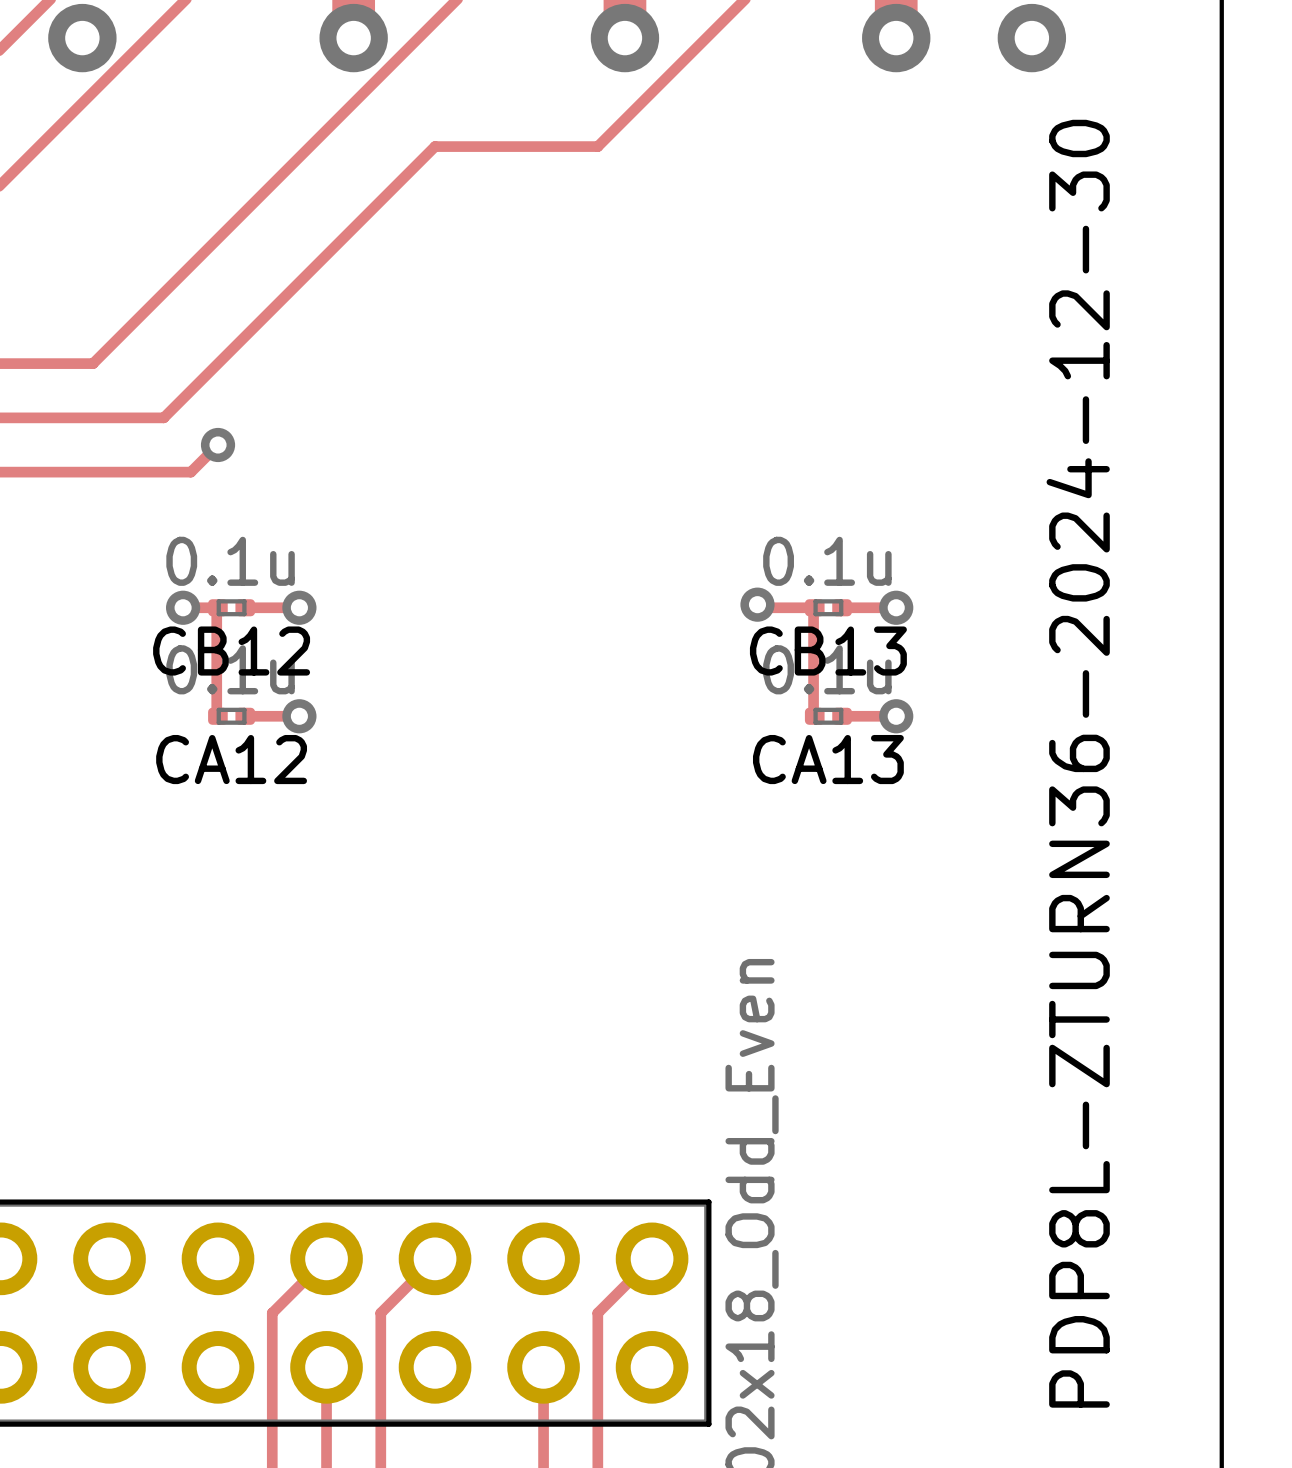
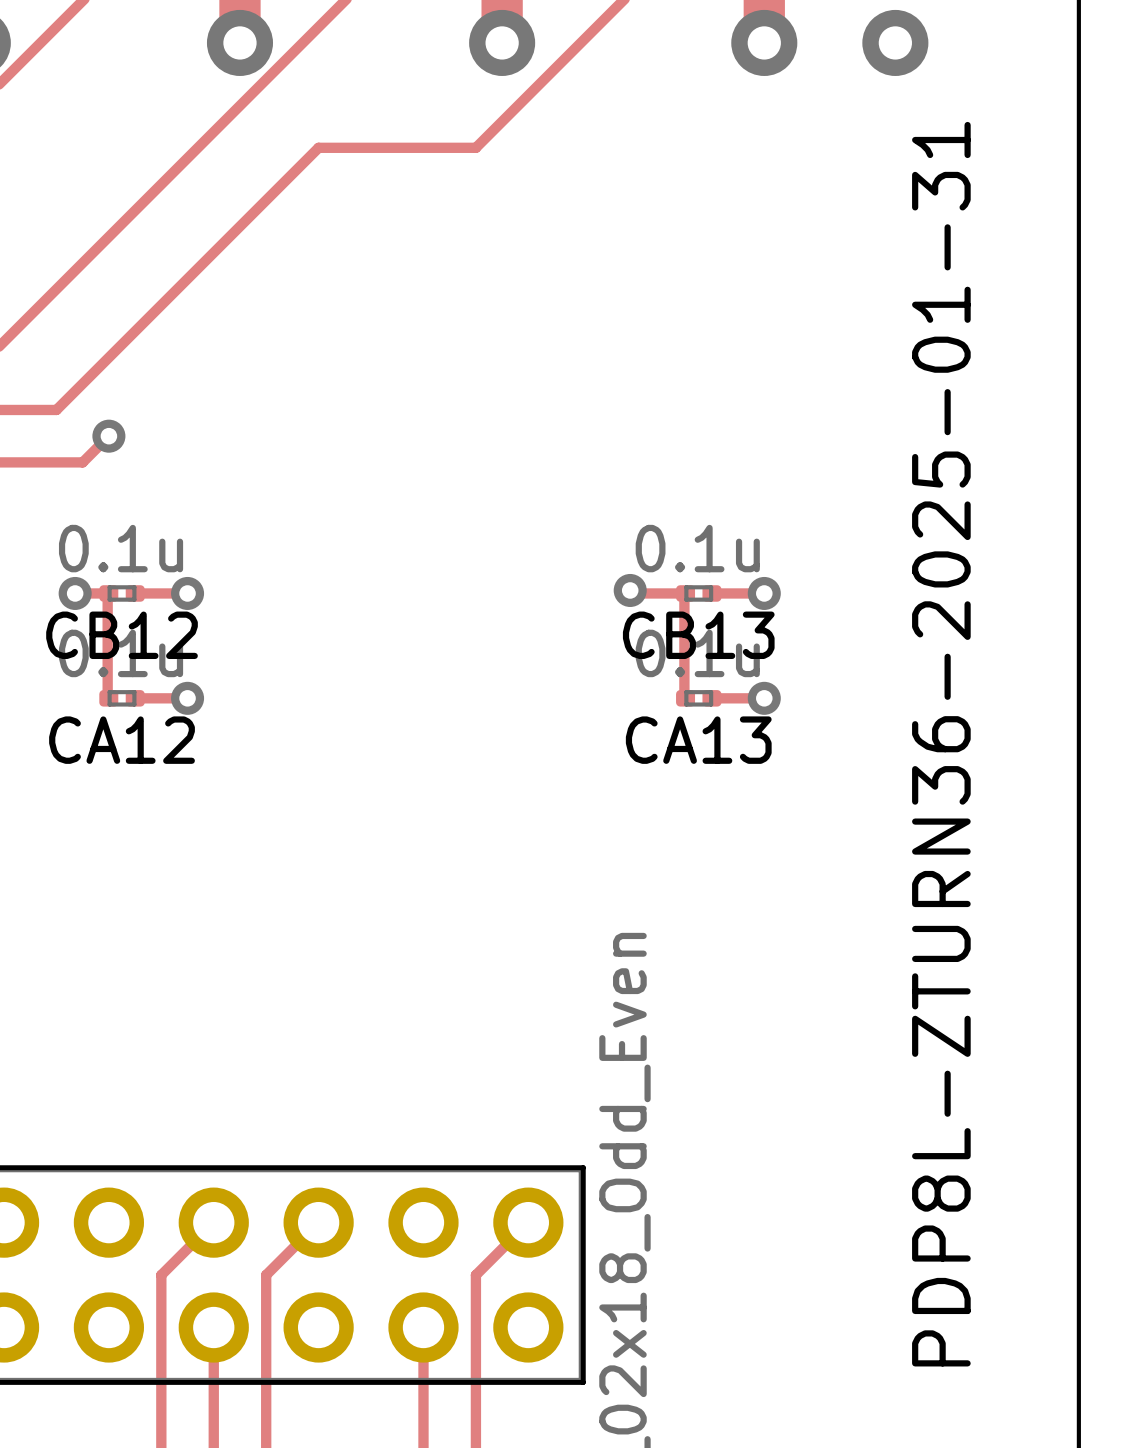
text: PDP8L-ZTURN36-2024-12-30 (1078, 763) -> PDP8L-ZTURN36-2025-01-31 (941, 744)

